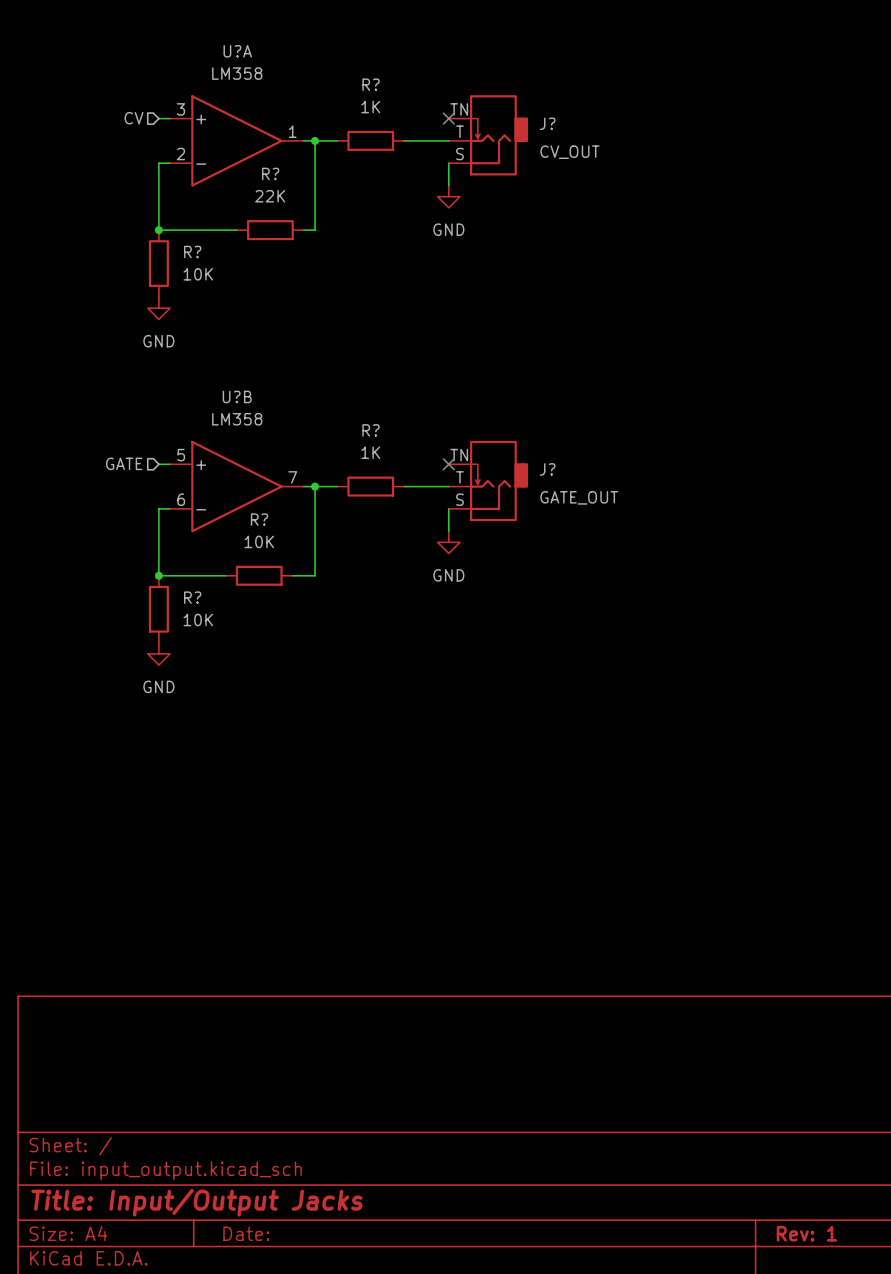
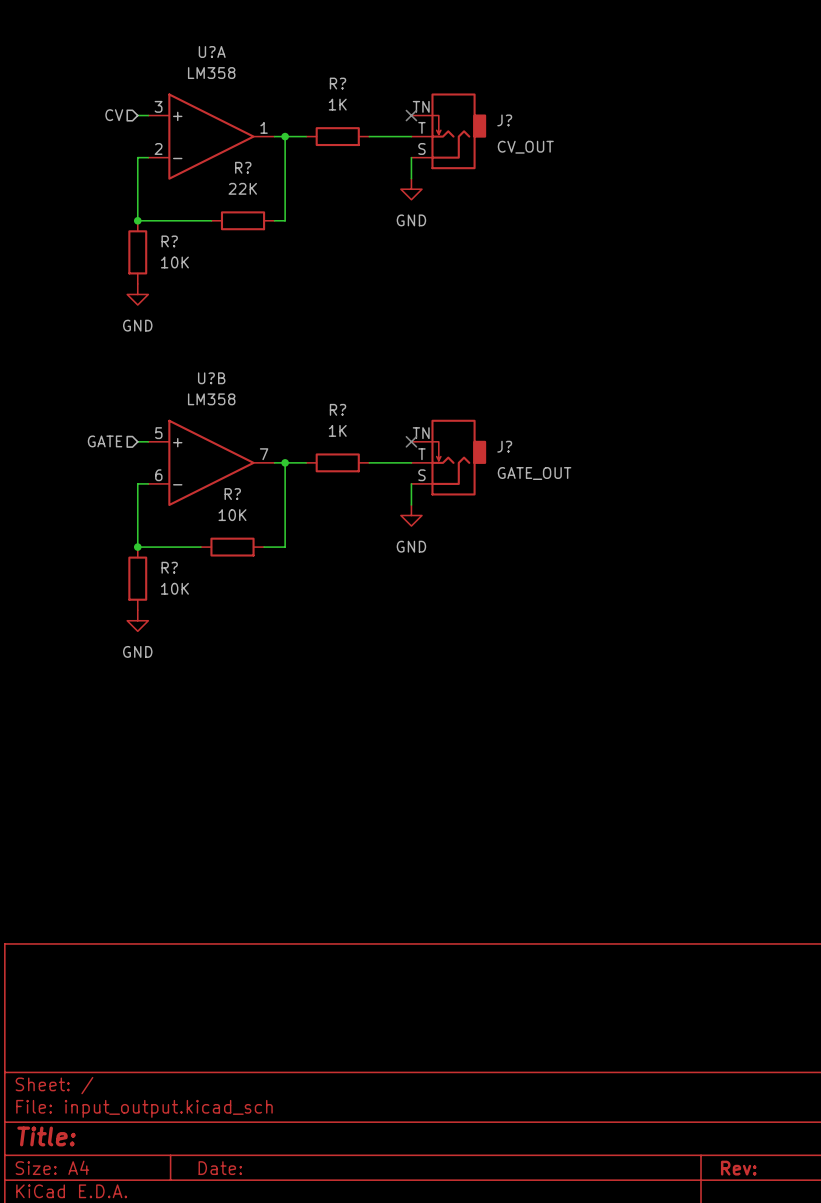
title block: Title: Input/Output Jacks (196, 1202) -> Title: (46, 1136)
title block: Rev: 1 (806, 1233) -> Rev: (738, 1168)

